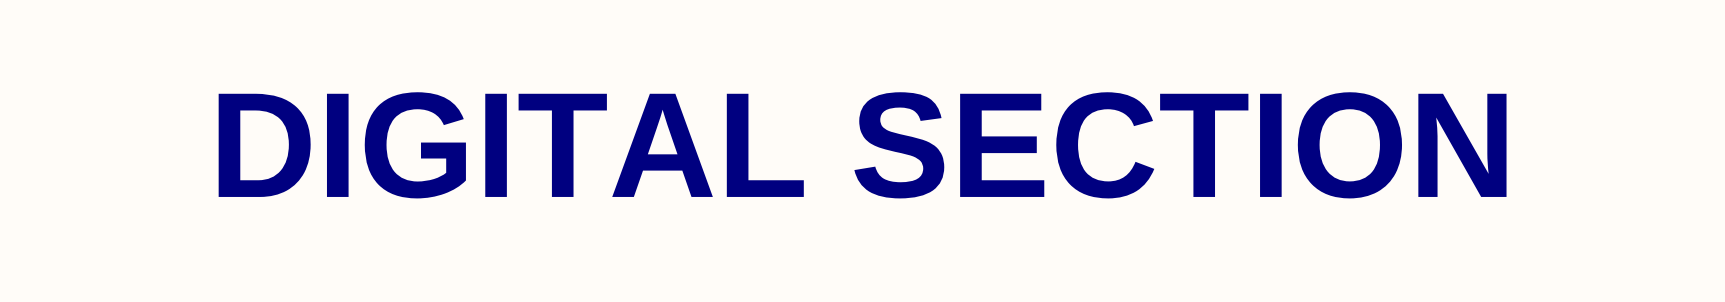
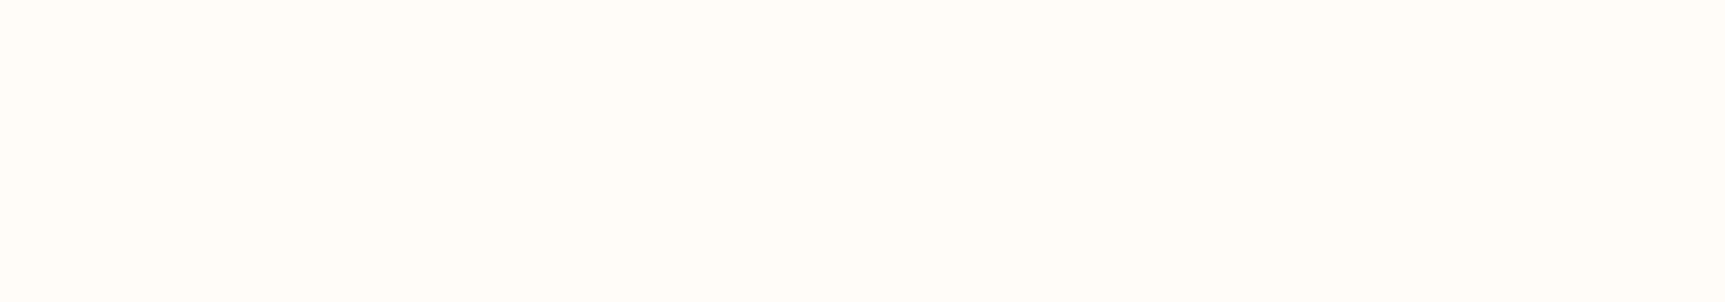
text: DIGITAL SECTION (862, 145) -> none

